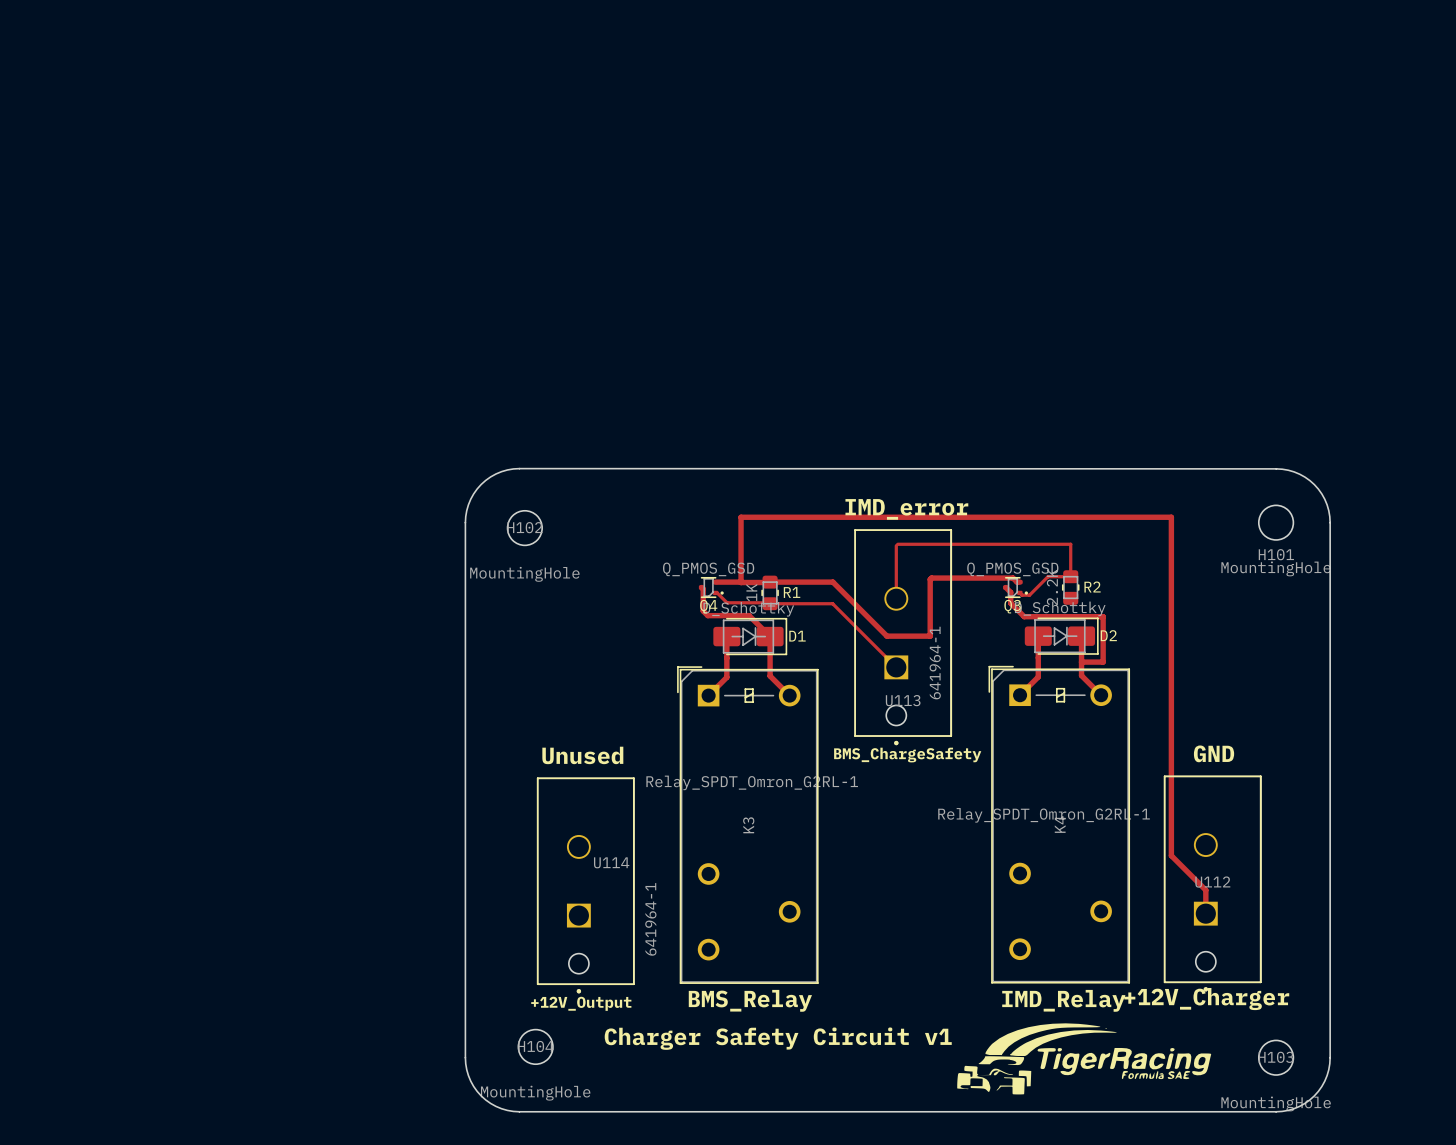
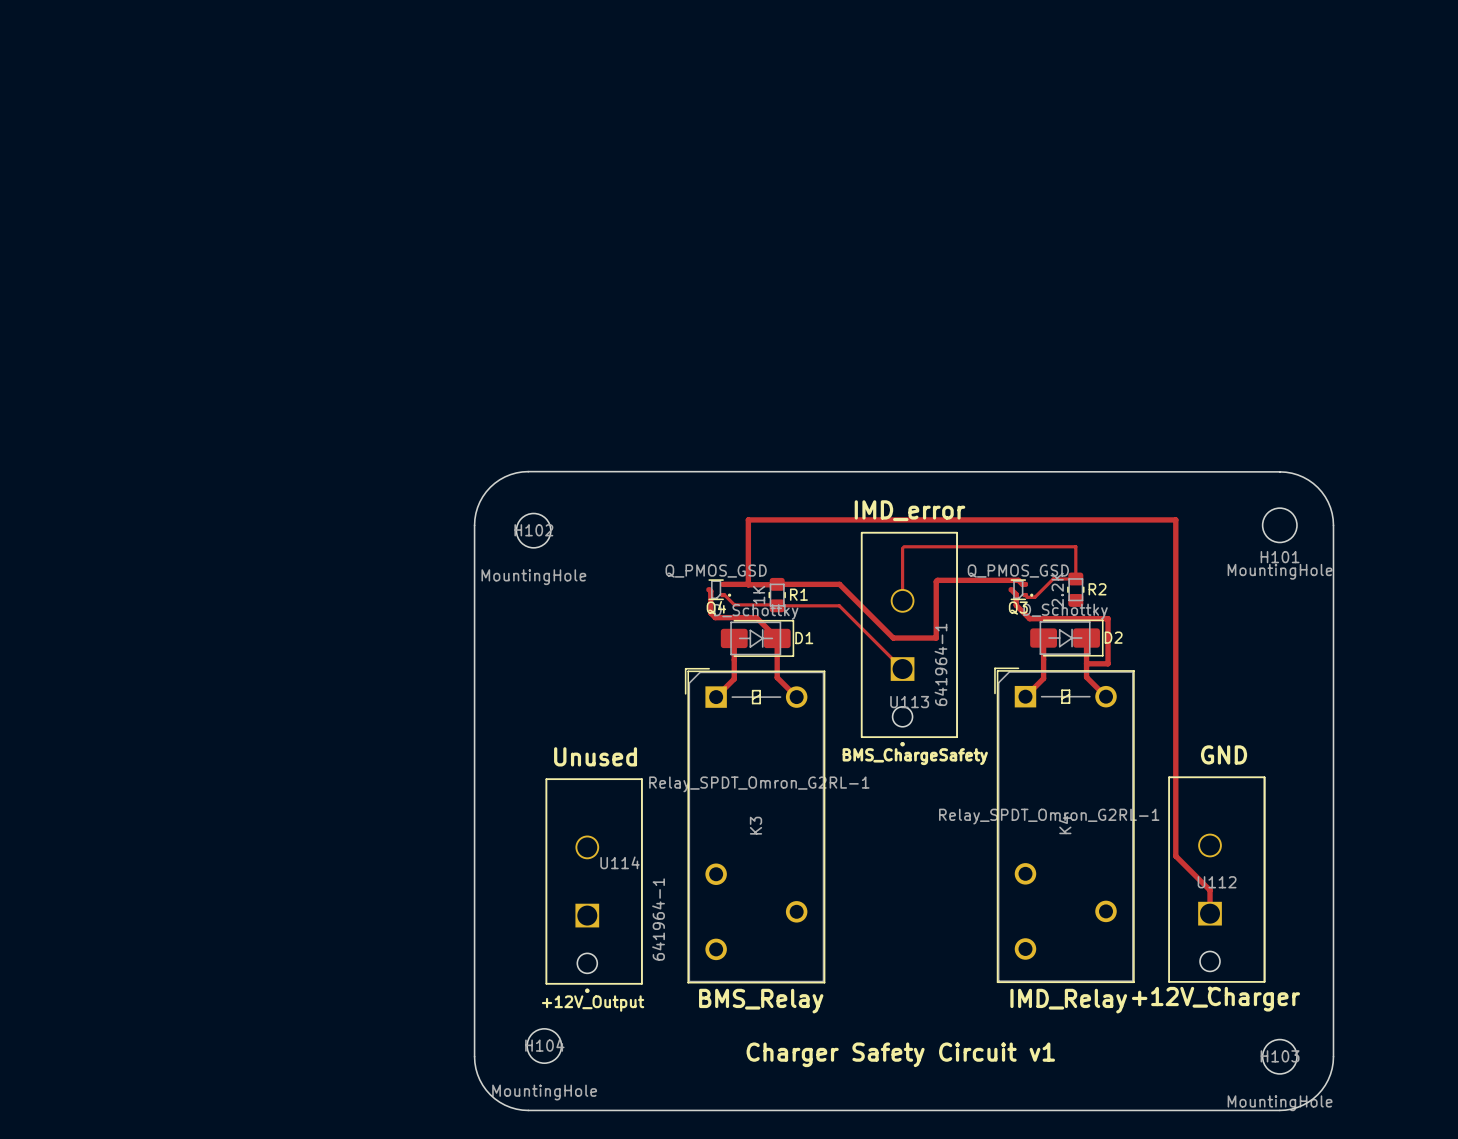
drawing: [957, 1023, 1212, 1095] -> none
text position: Charger Safety Circuit v1 (778, 1038) -> Charger Safety Circuit v1 (900, 1054)

